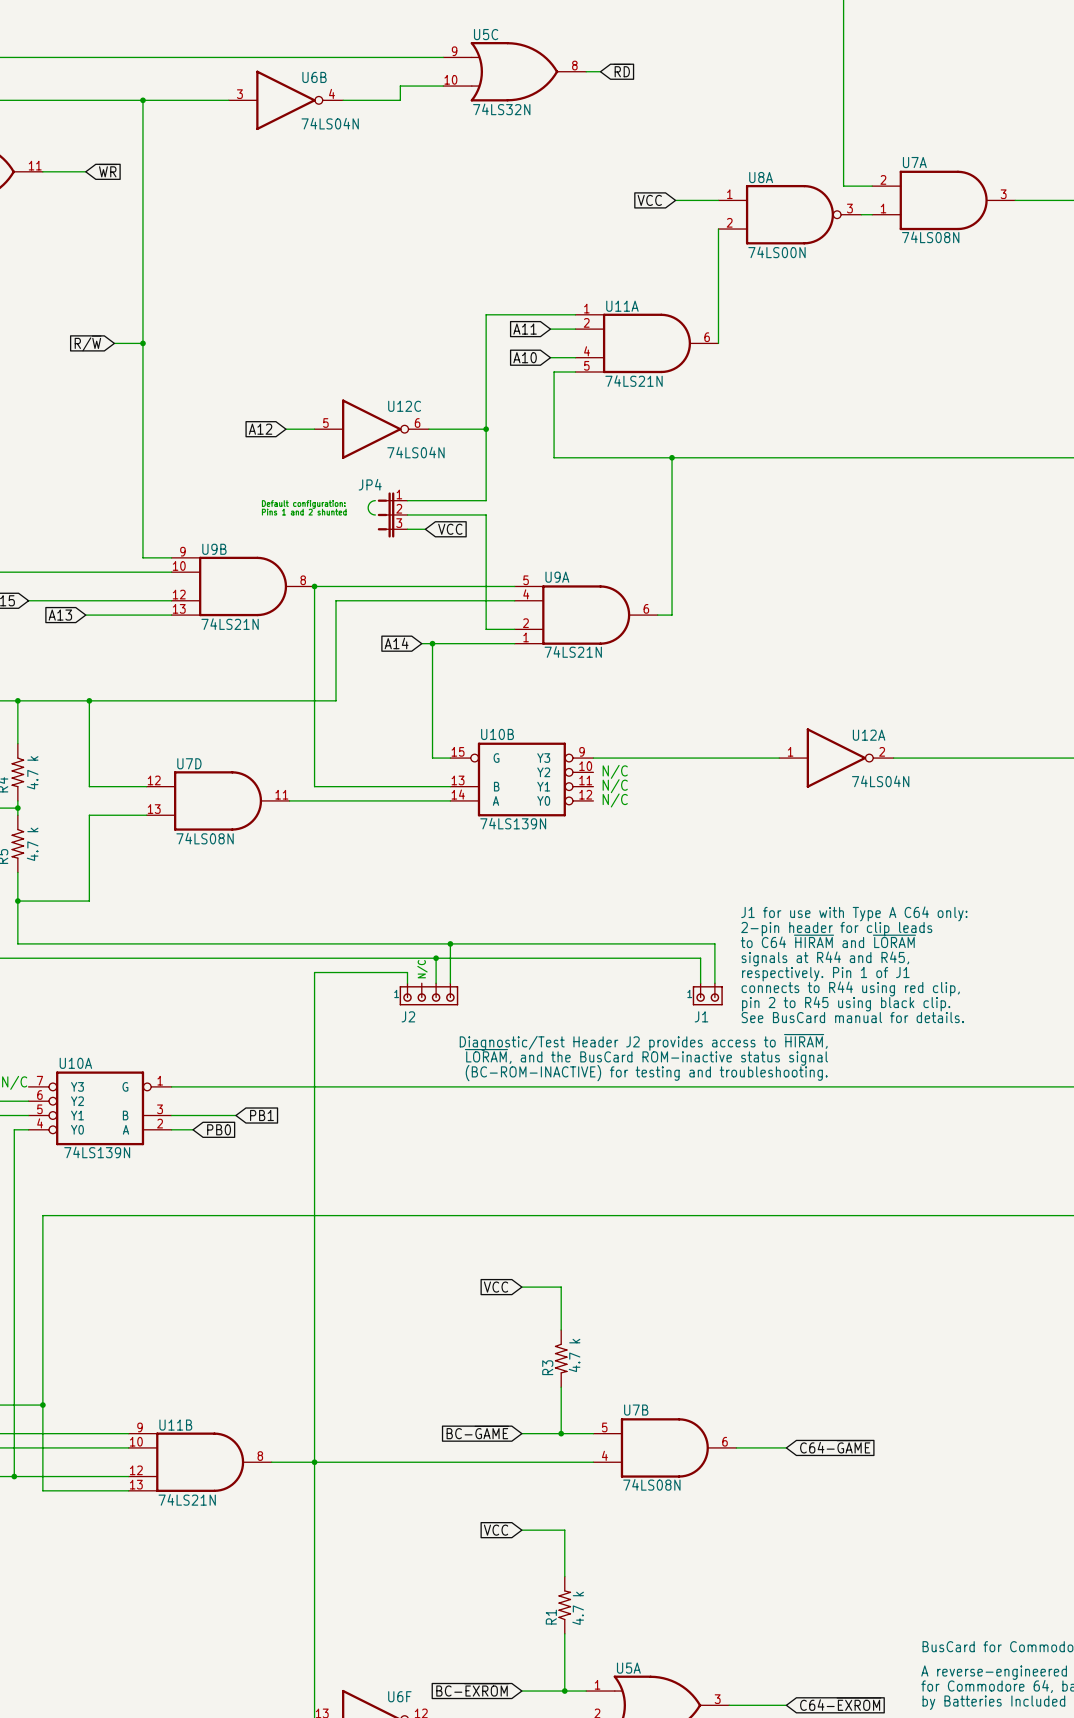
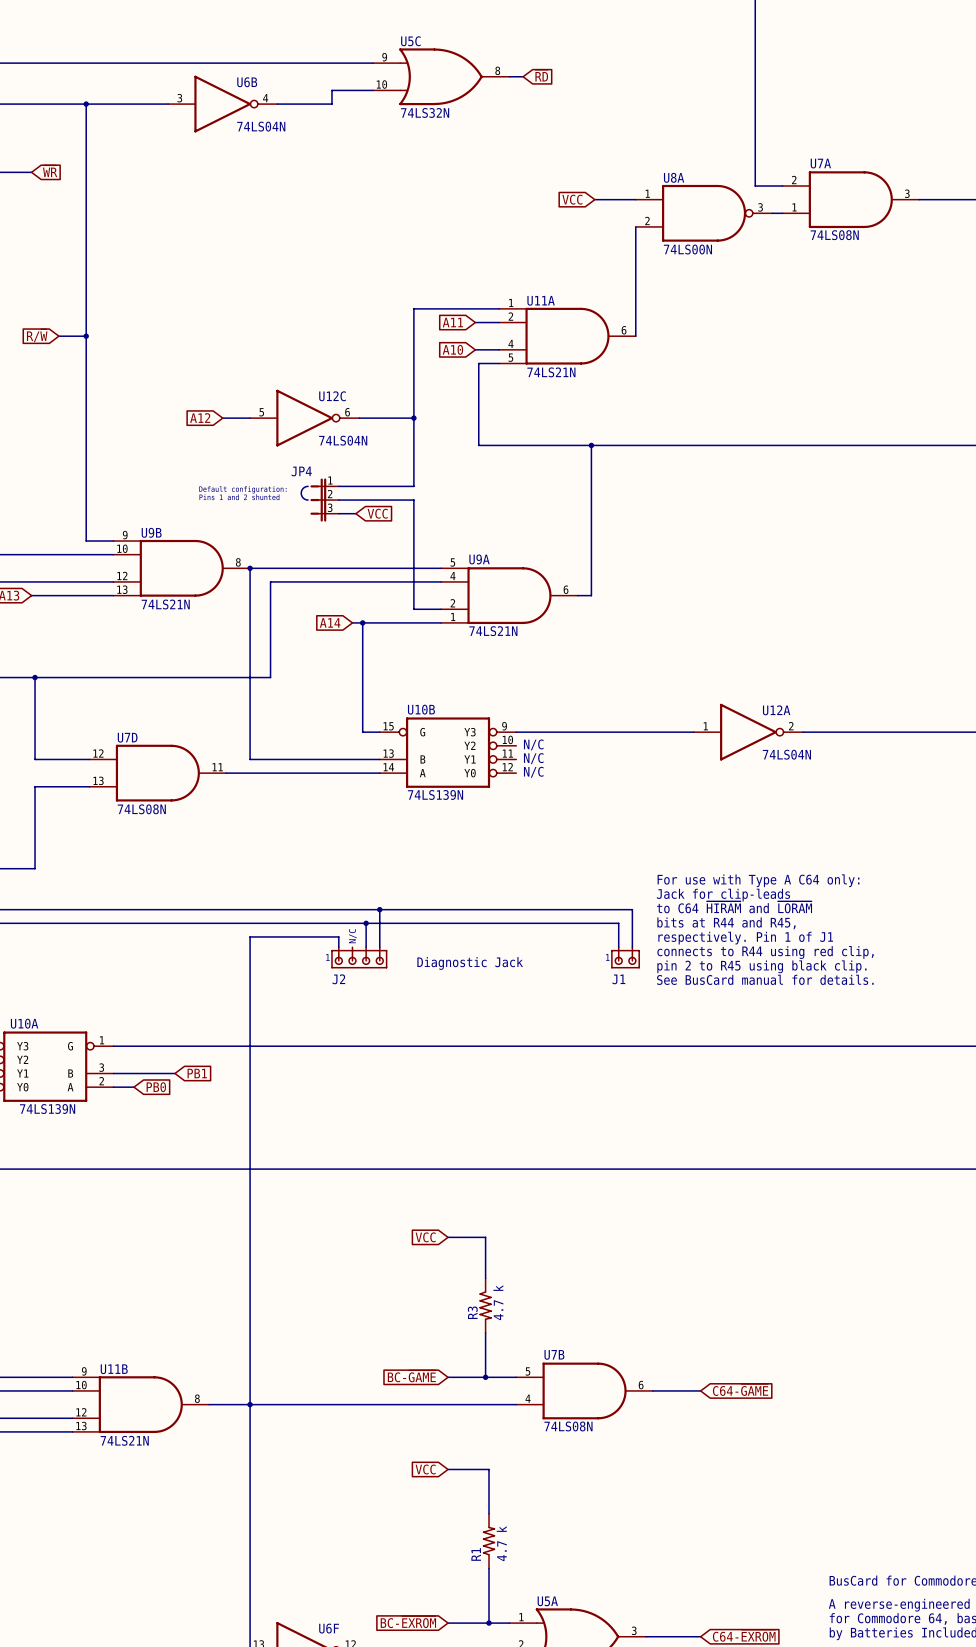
text: J1 for use with Type A C64 only: (854, 913) -> For use with Type A C64 only: (758, 880)
text: 2-pin header for clip leads (836, 929) -> Jack for clip-leads (723, 895)
text: signals at R44 and R45, (825, 958) -> bits at R44 and R45, (726, 923)
text: none -> Diagnostic Jack (470, 963)
text: Diagnostic/Test Header J2 provides access to ~{HIRAM}, (643, 1042) -> none
text: ~{LORAM}, and the BusCard ROM-inactive status signal (646, 1057) -> none
text: (BC-ROM-INACTIVE) for testing and troubleshooting. (646, 1073) -> none

